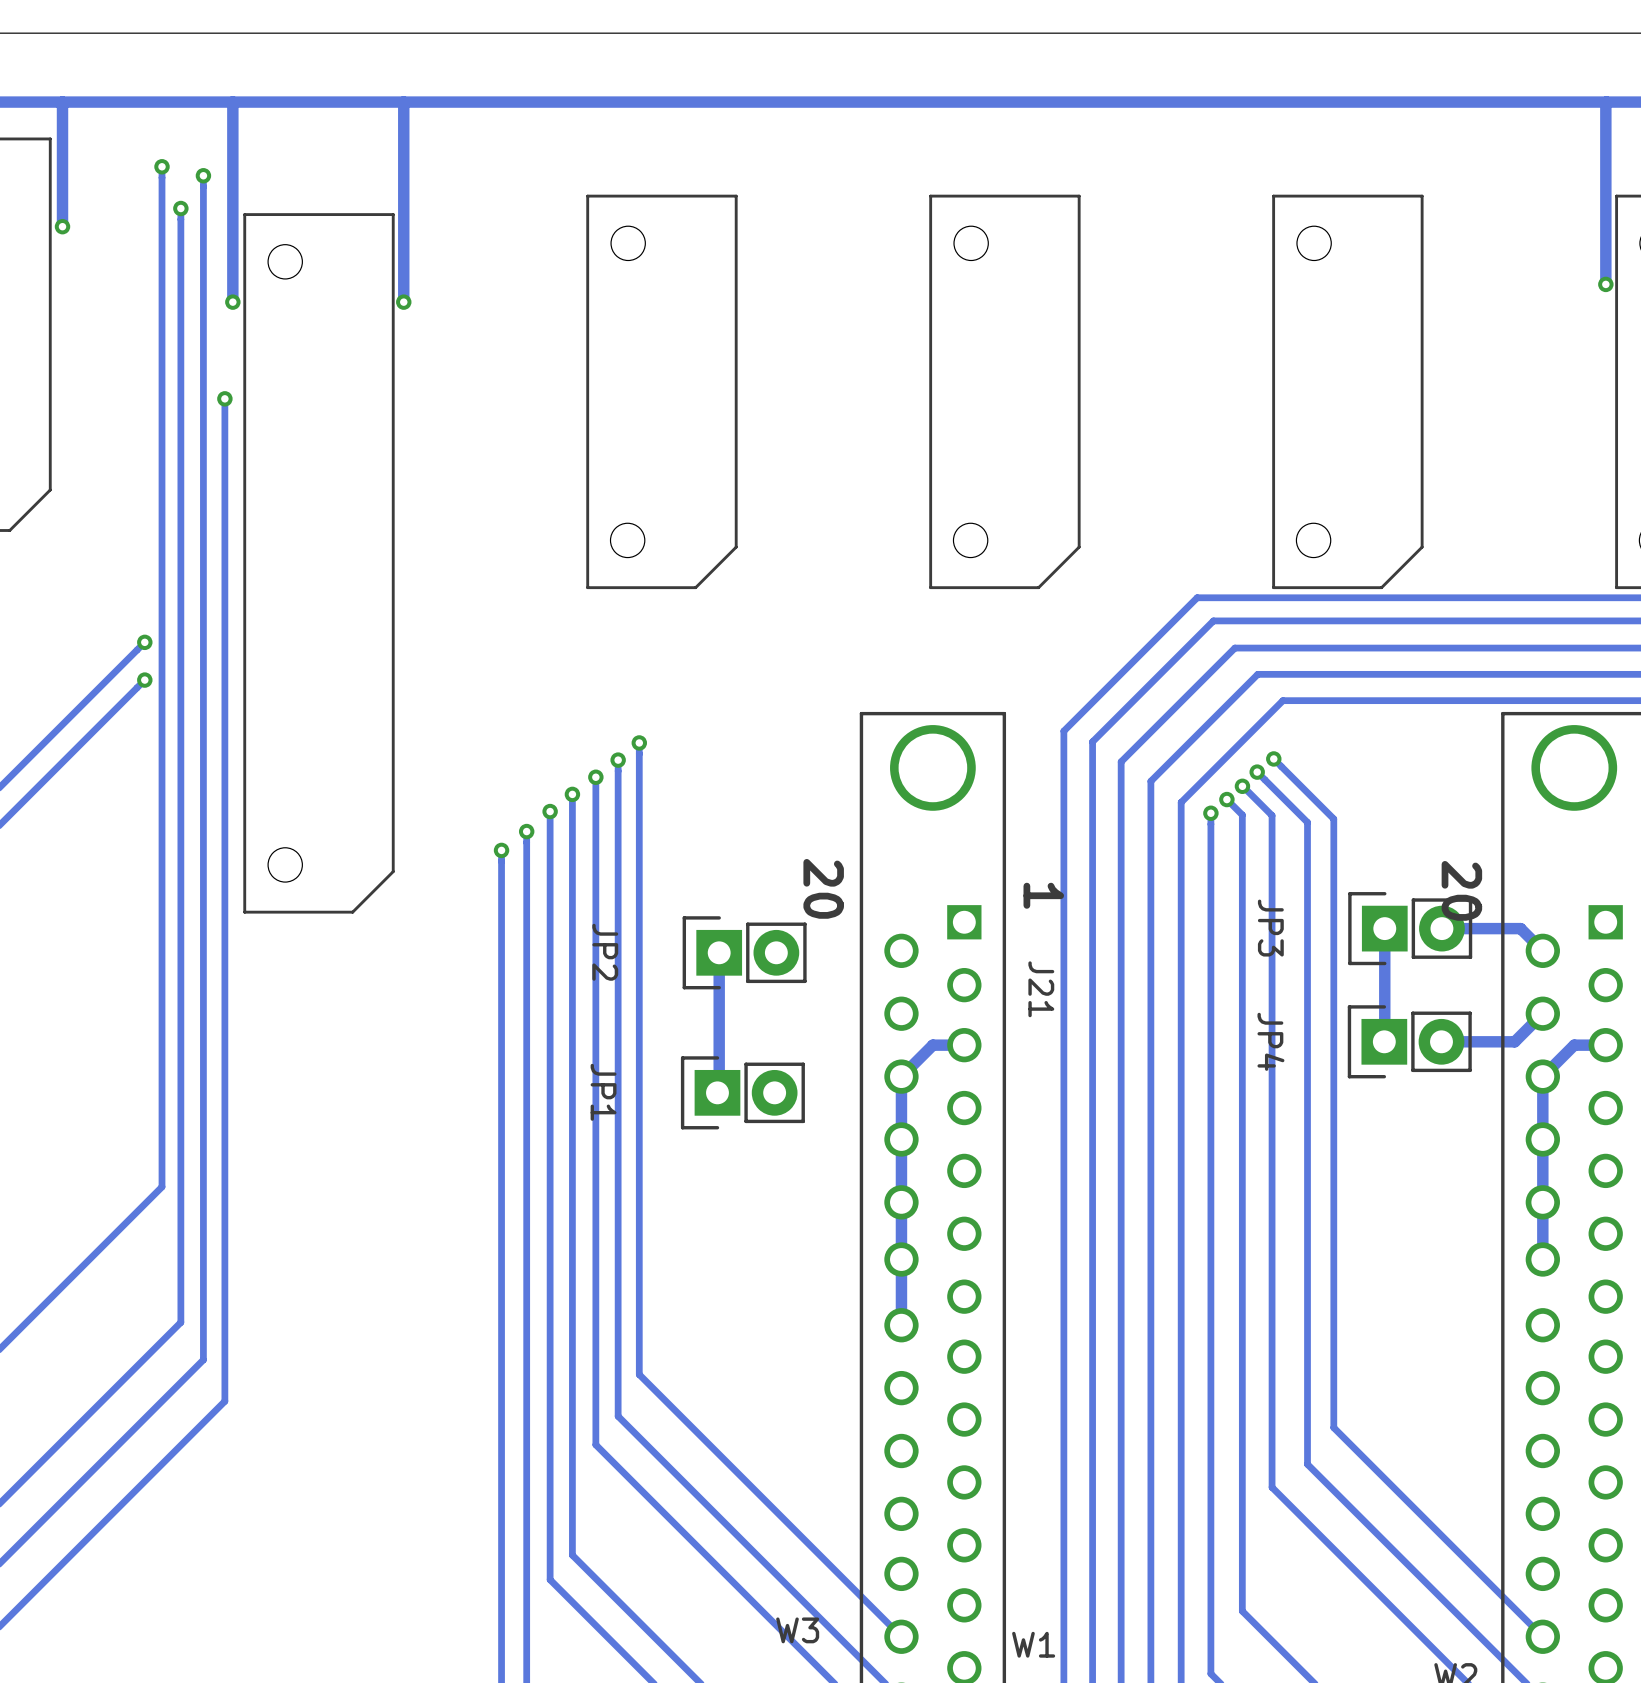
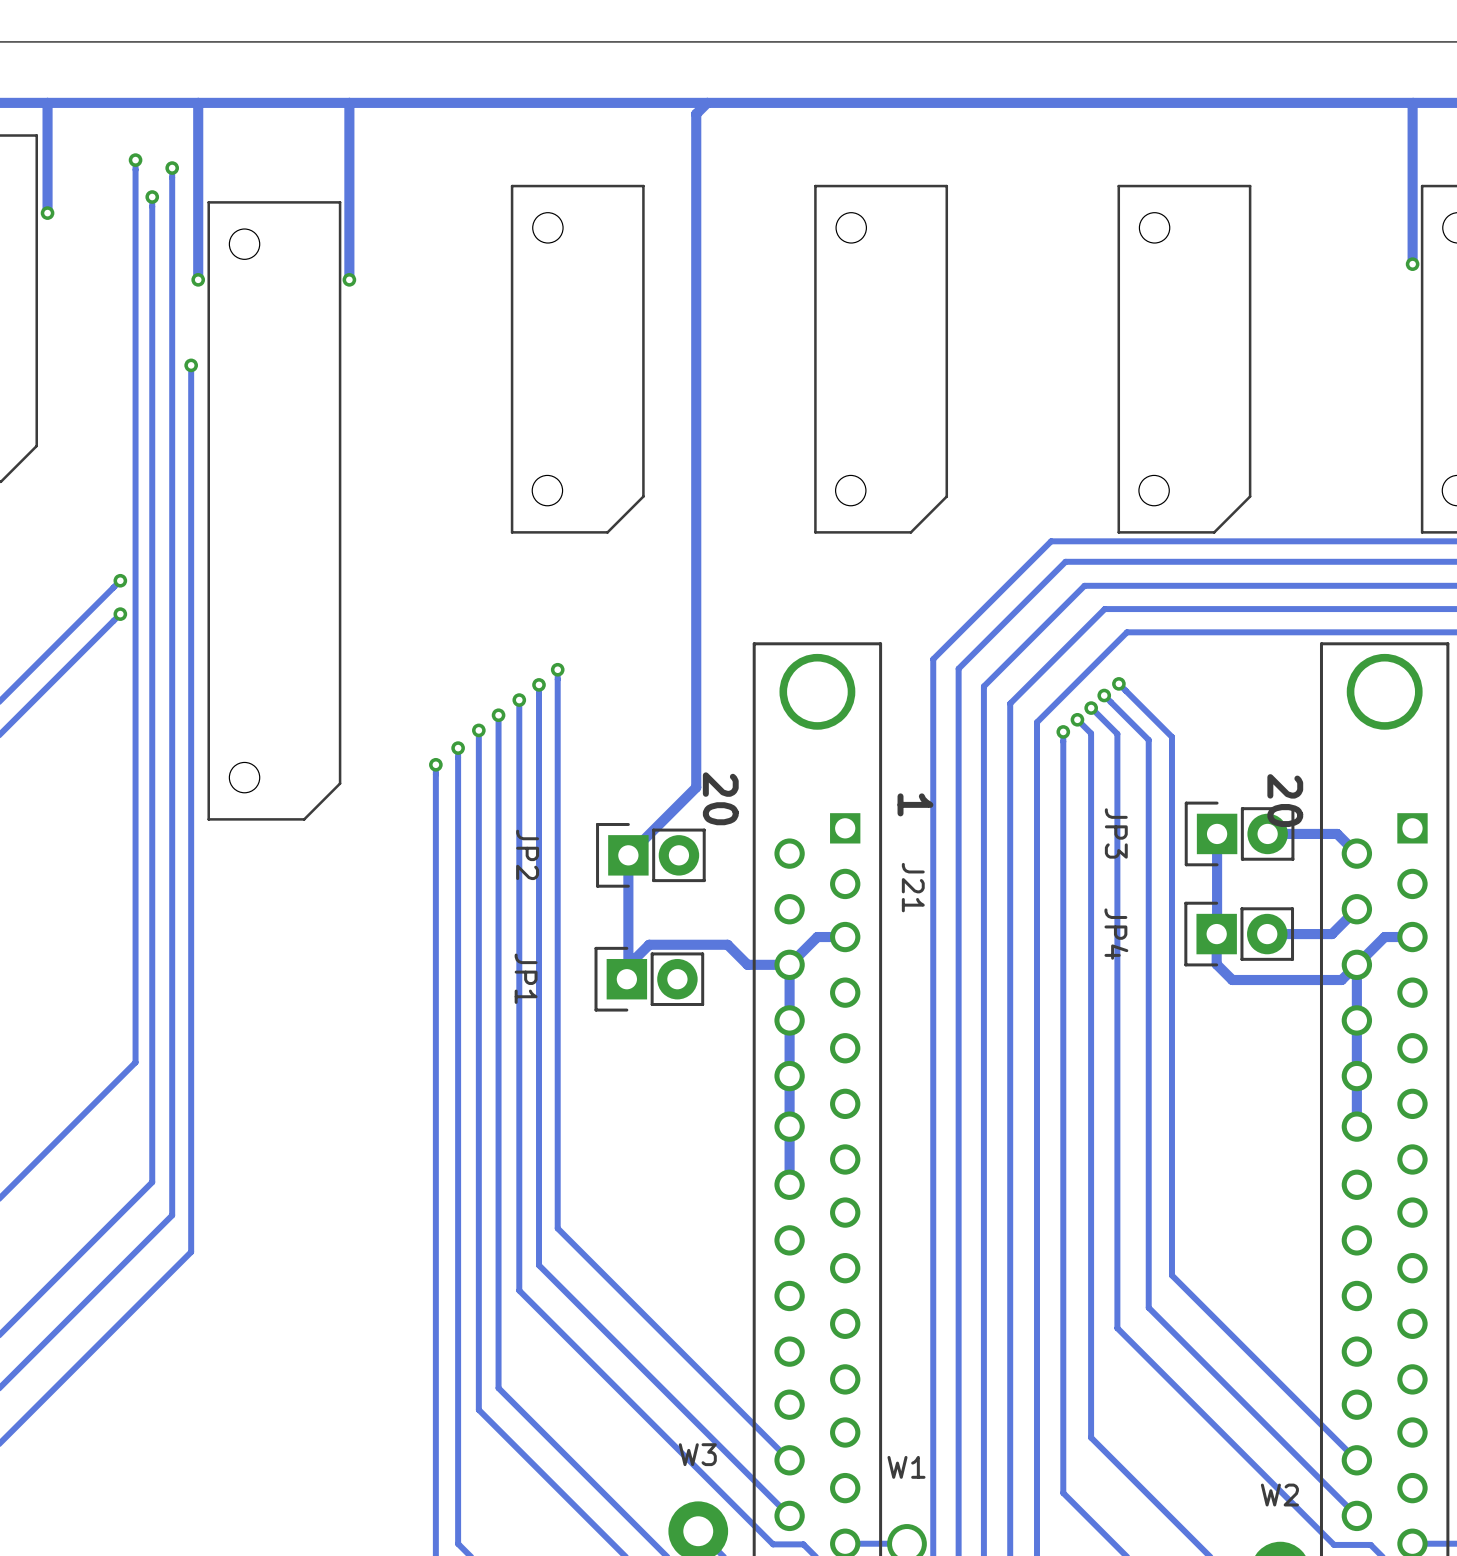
track: none -> (707, 102) (696, 114) (696, 787) (628, 855)
track: none -> (1216, 934) (1216, 964) (1232, 980) (1341, 980) (1356, 964)
track: none -> (789, 964) (747, 964) (727, 944) (649, 944) (626, 967) (626, 979)

